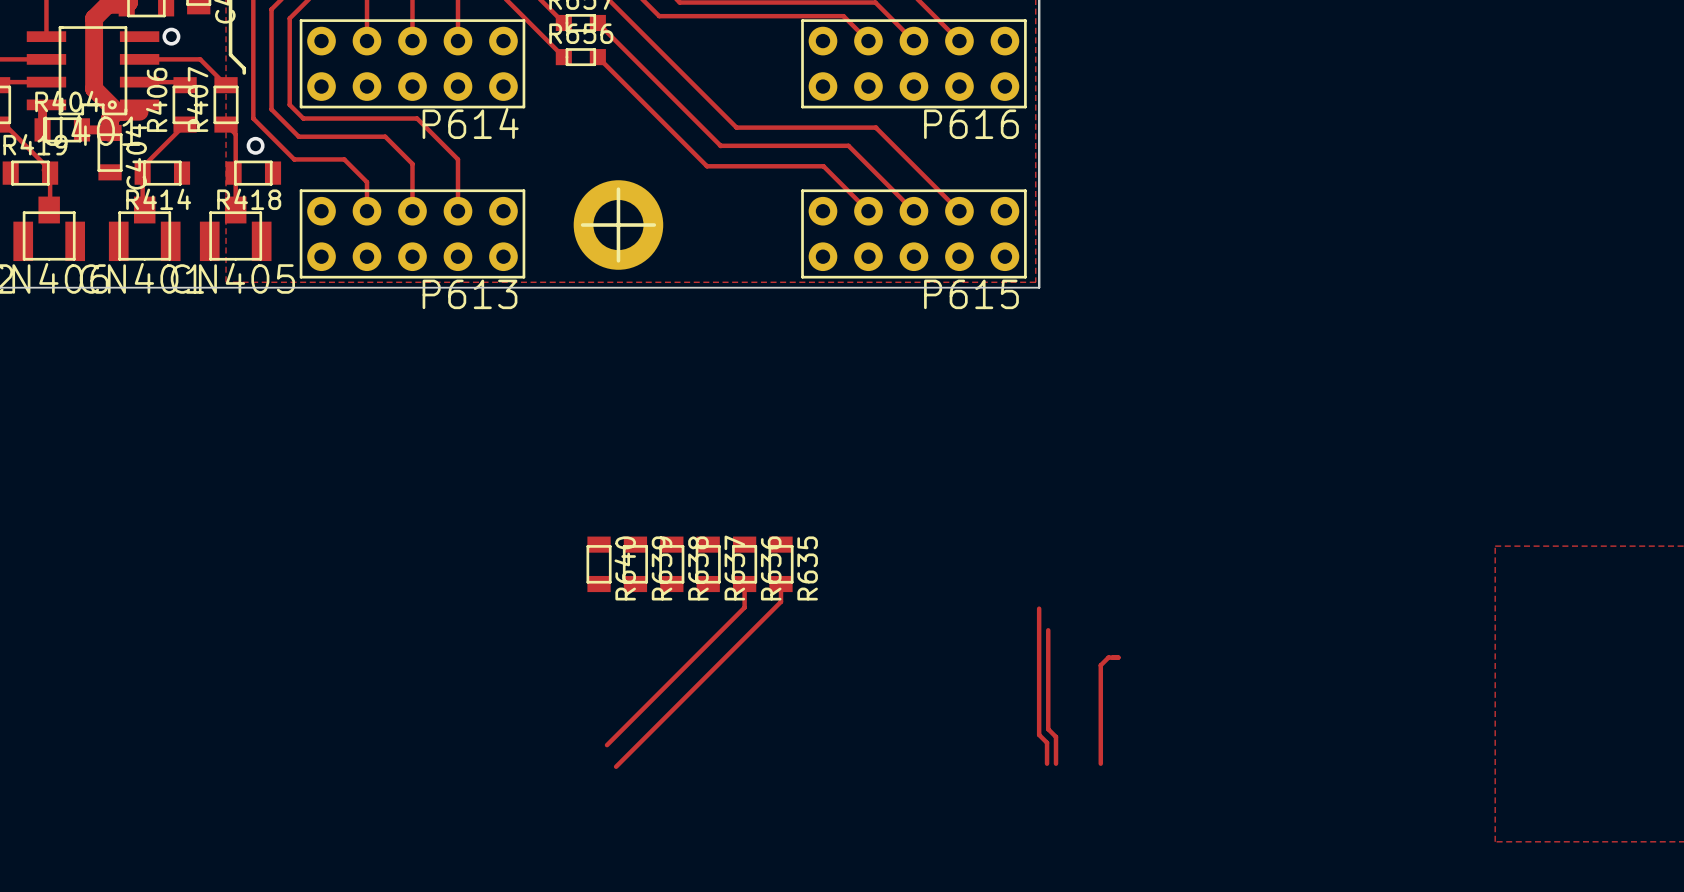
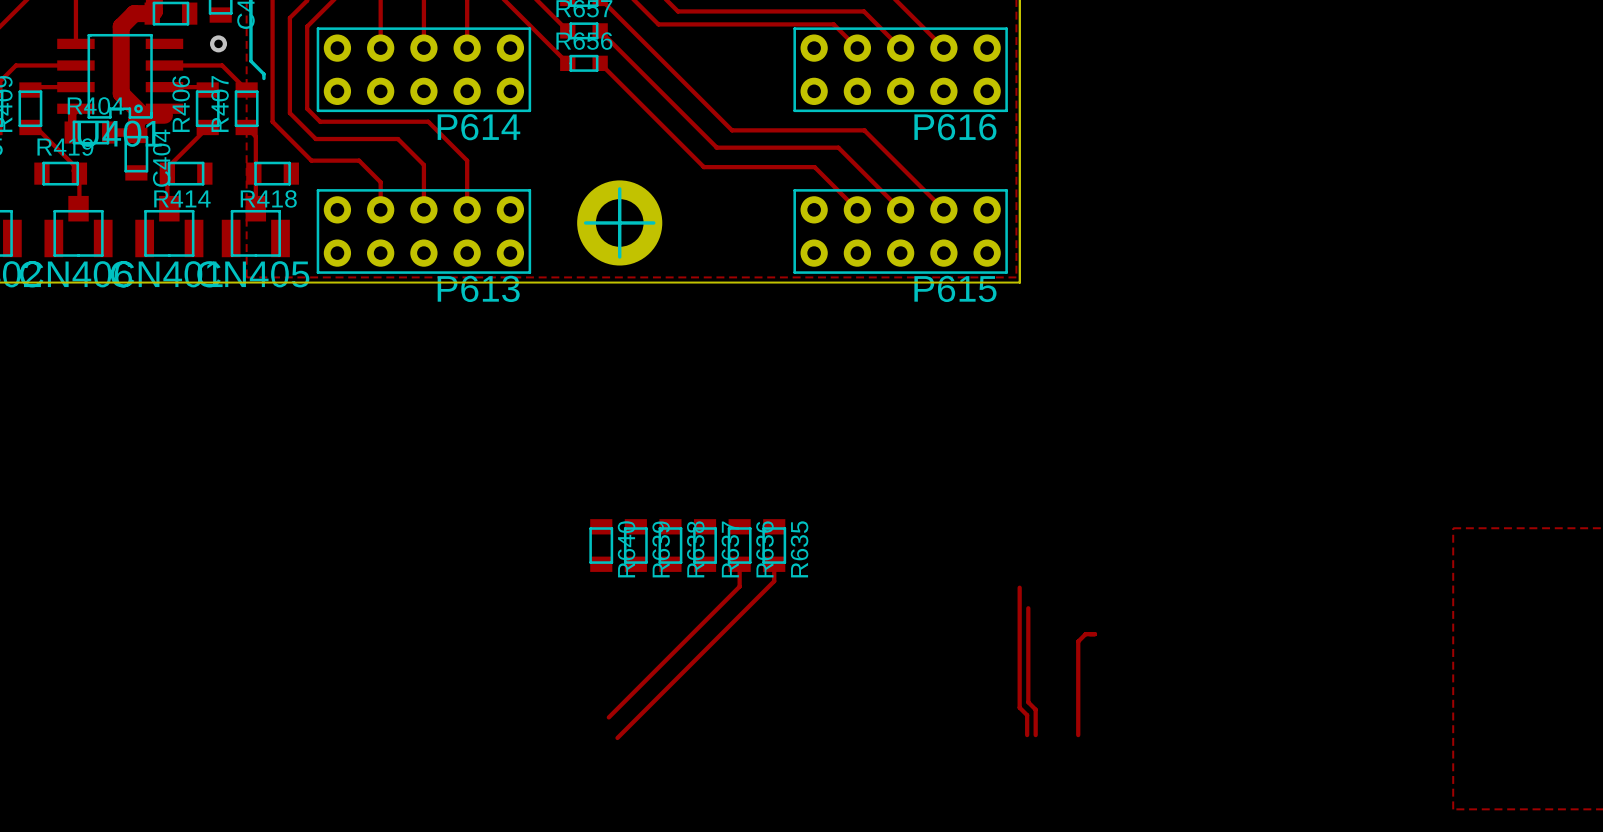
via: (171, 36) -> none
via: none -> (218, 43)
via: (255, 145) -> none

